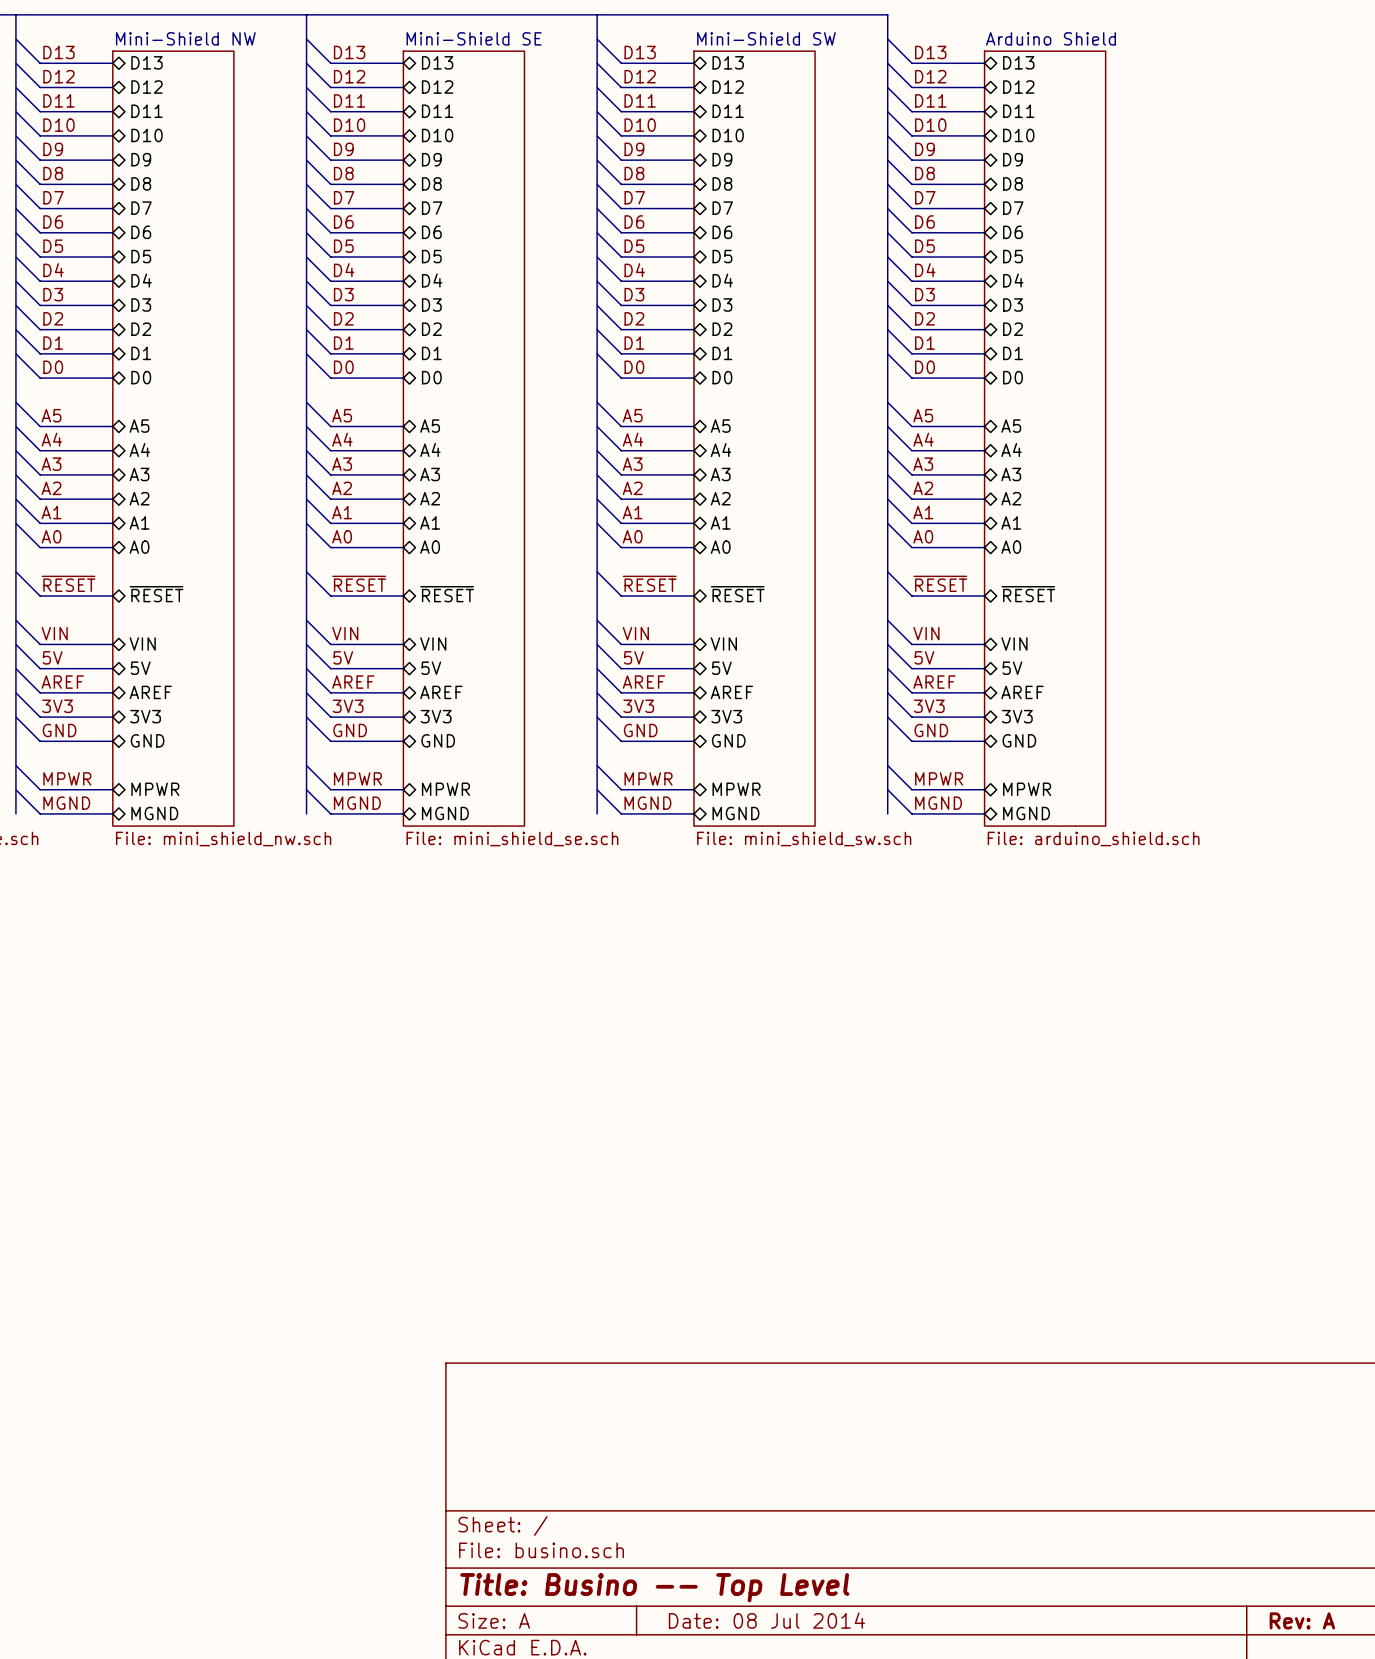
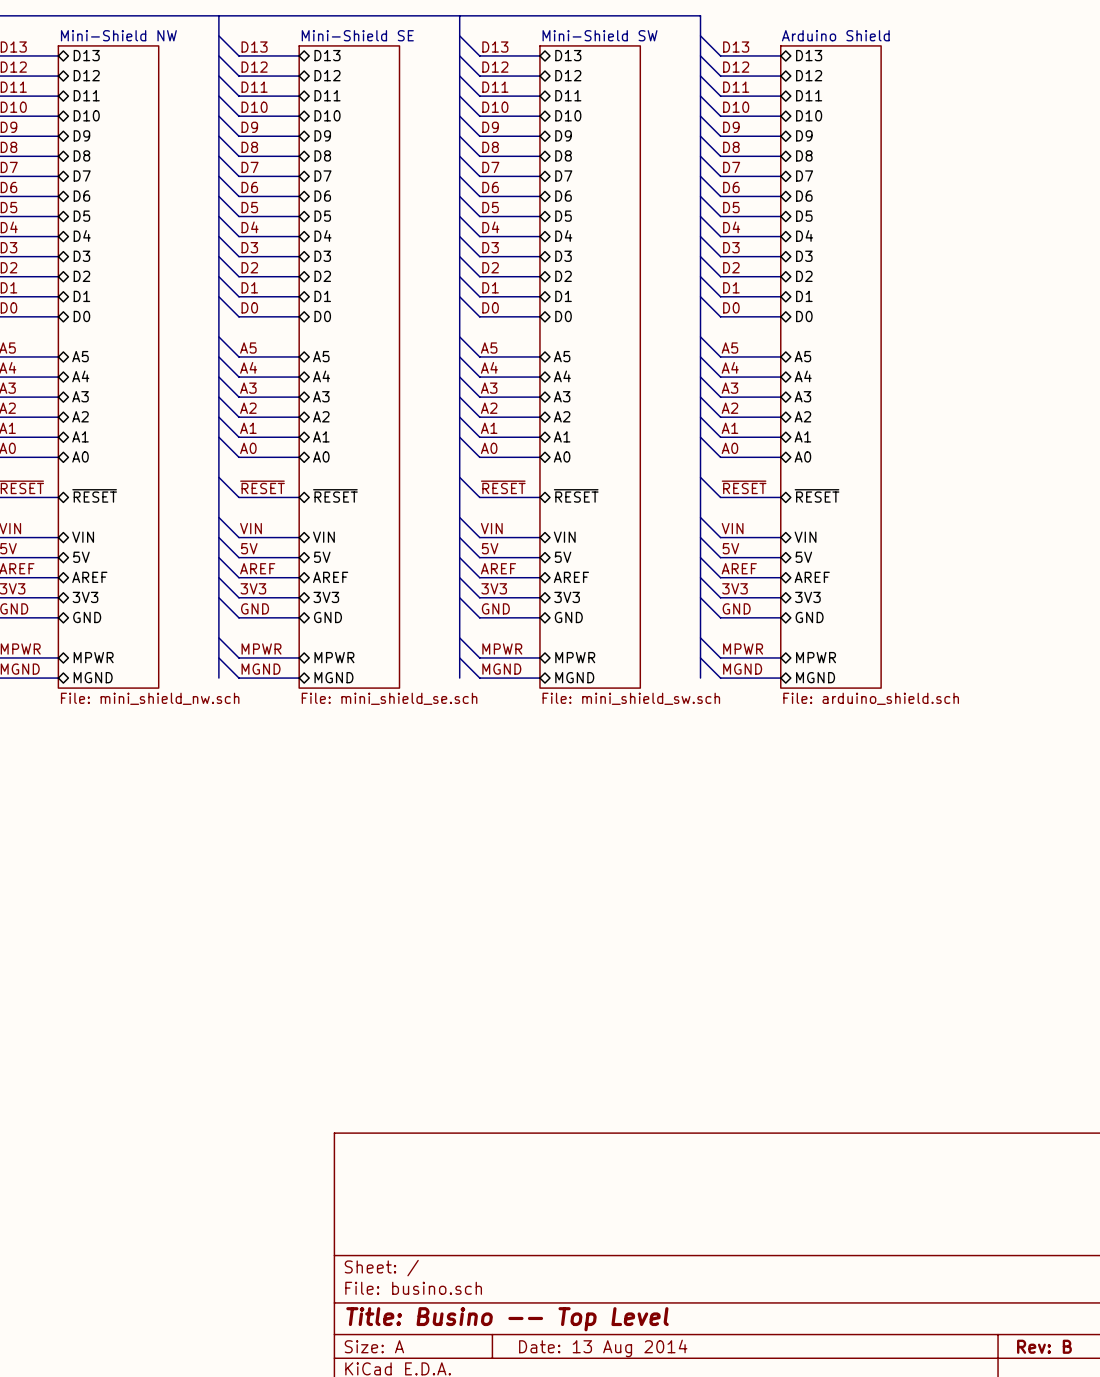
title block: Date: 08 Jul 2014 (766, 1620) -> Date: 13 Aug 2014 (603, 1348)
title block: Rev: A (1302, 1620) -> Rev: B (1044, 1346)

